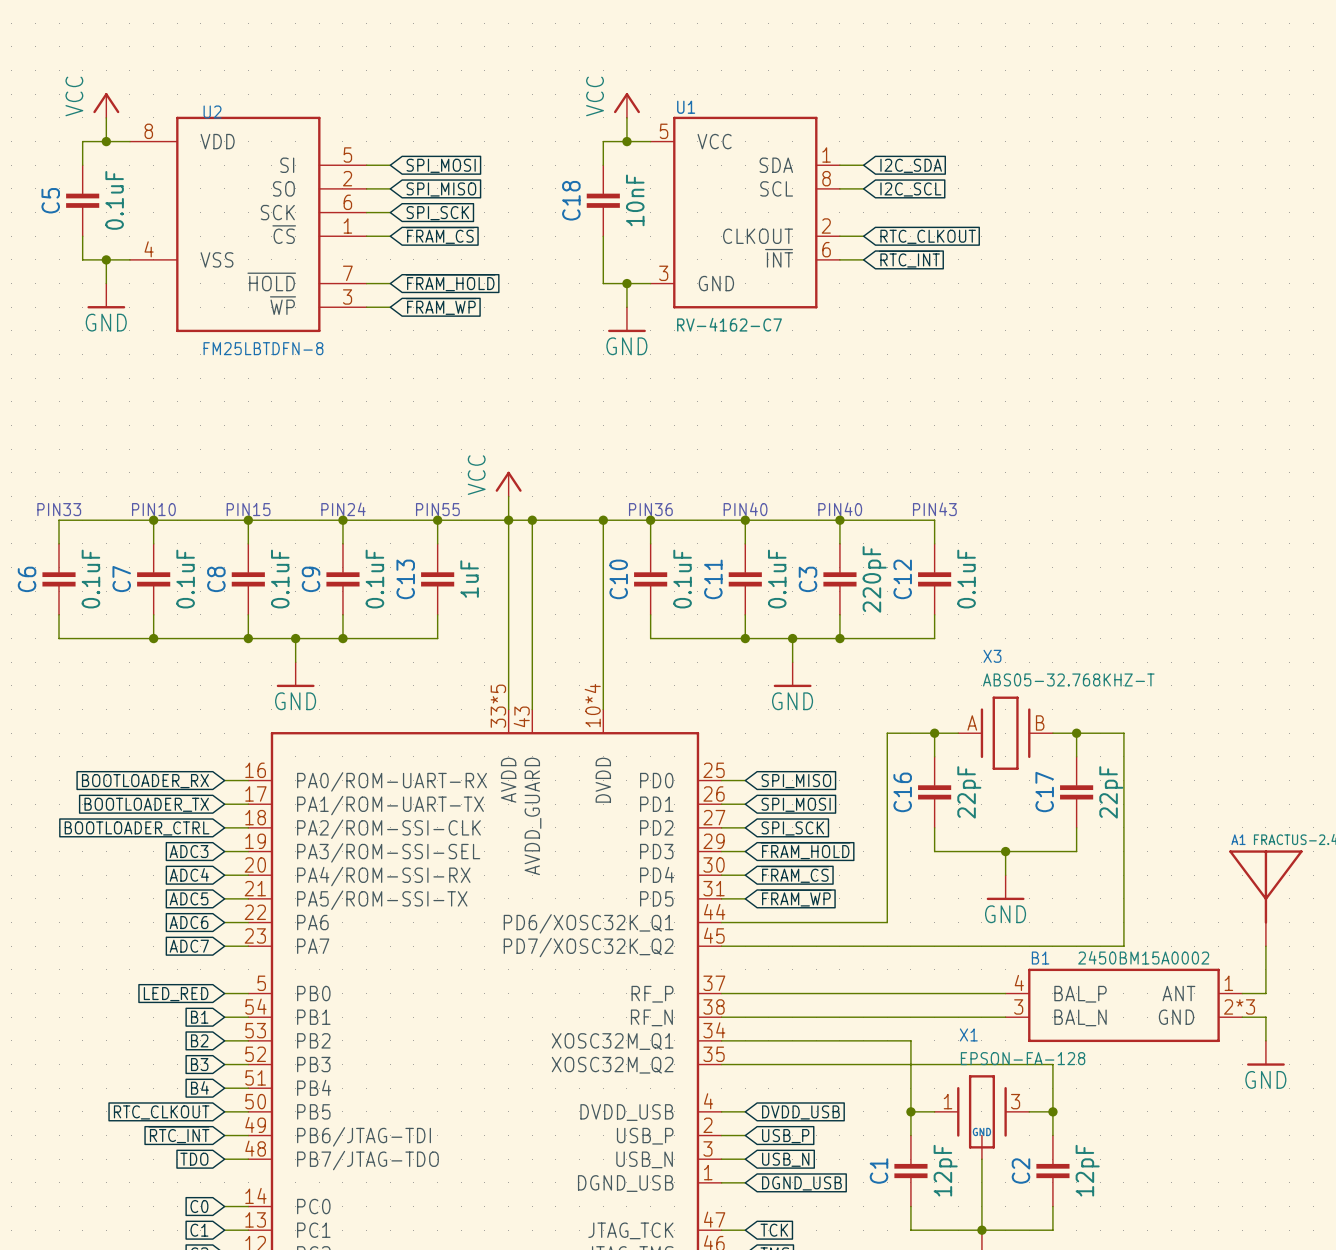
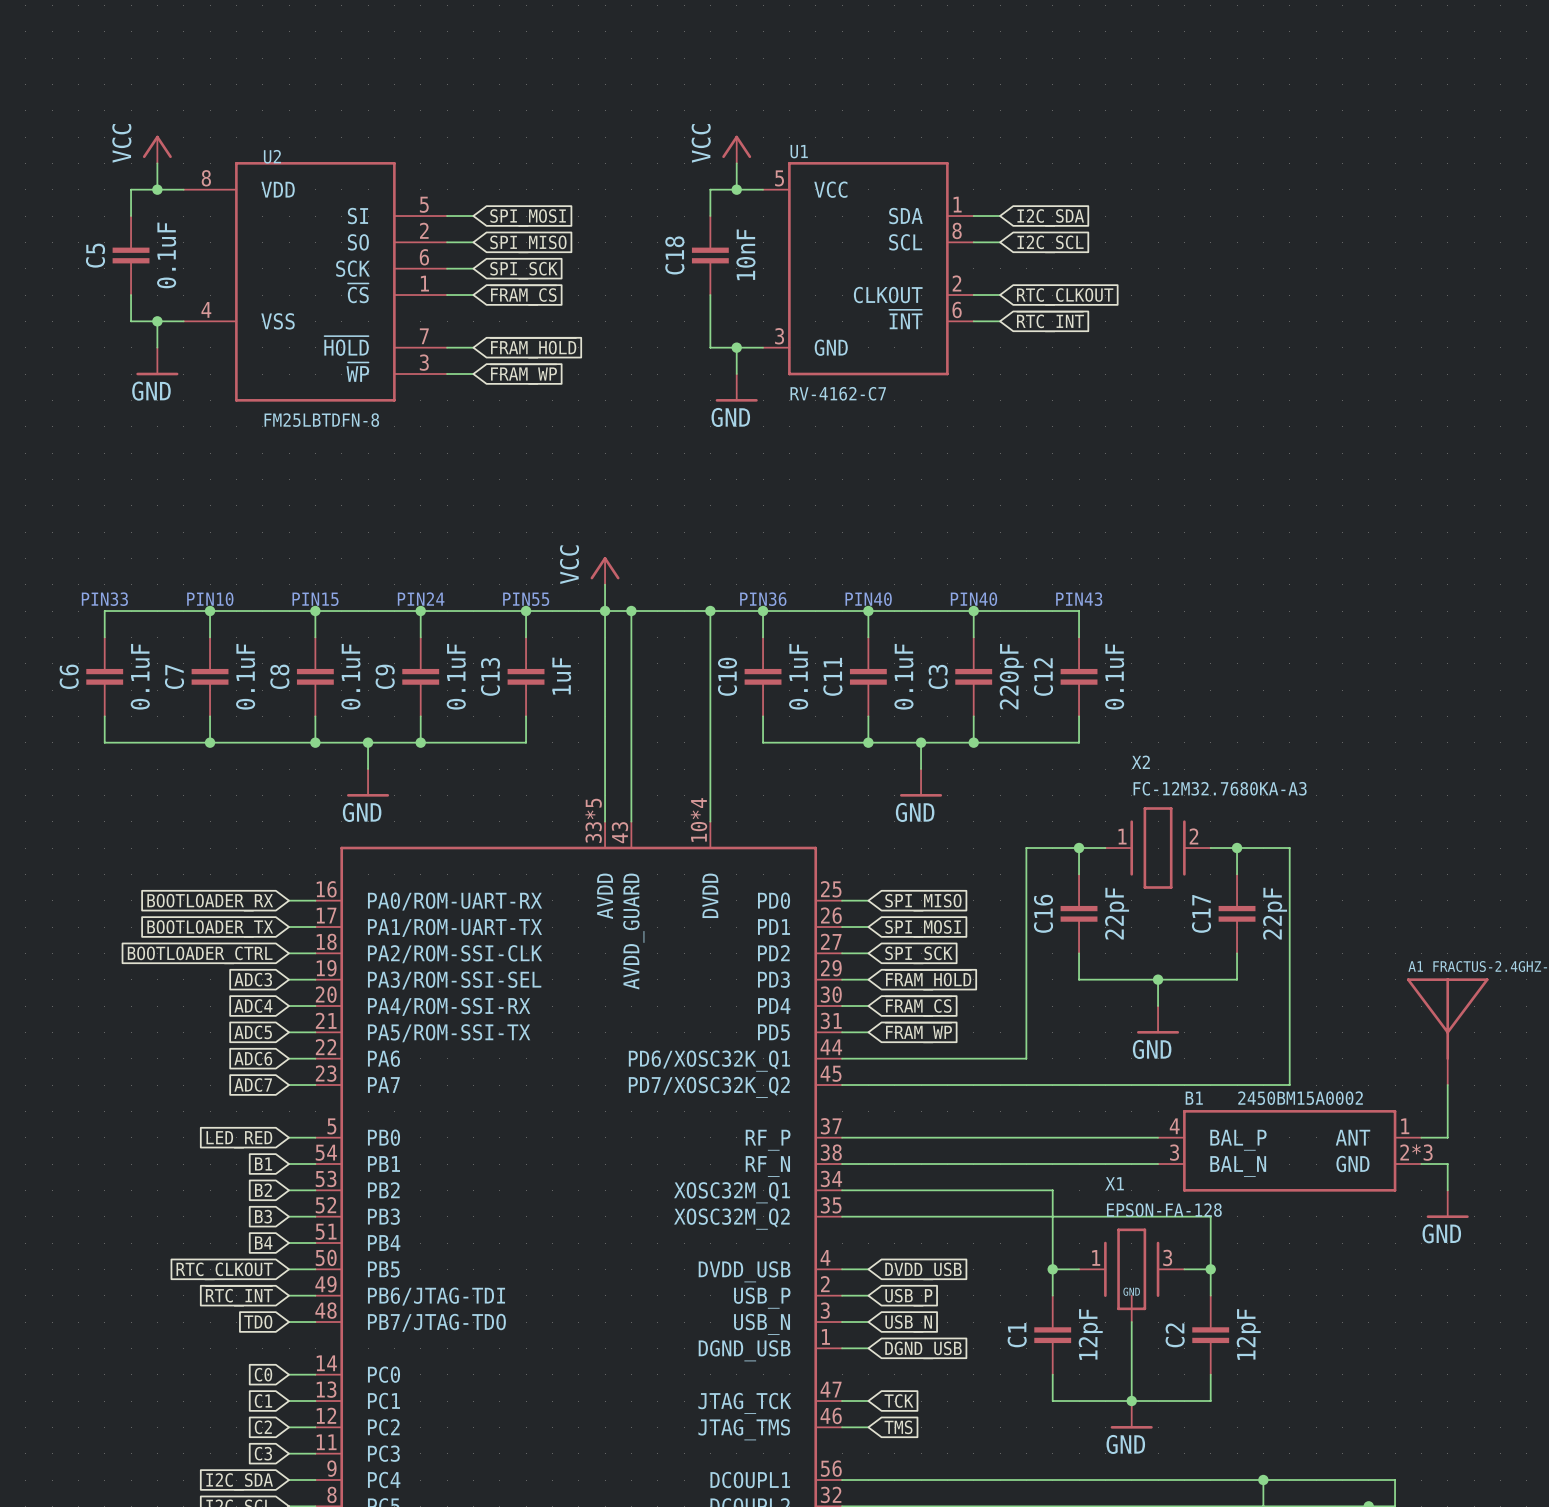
X3 name: X3 (992, 656) -> X2 (1140, 762)
X3 value: ABS05-32.768KHZ-T (1068, 679) -> FC-12M32.7680KA-A3 (1220, 788)
X3 pin number: A (972, 722) -> 1 (1122, 836)
X3 pin number: B (1040, 722) -> 2 (1193, 836)

